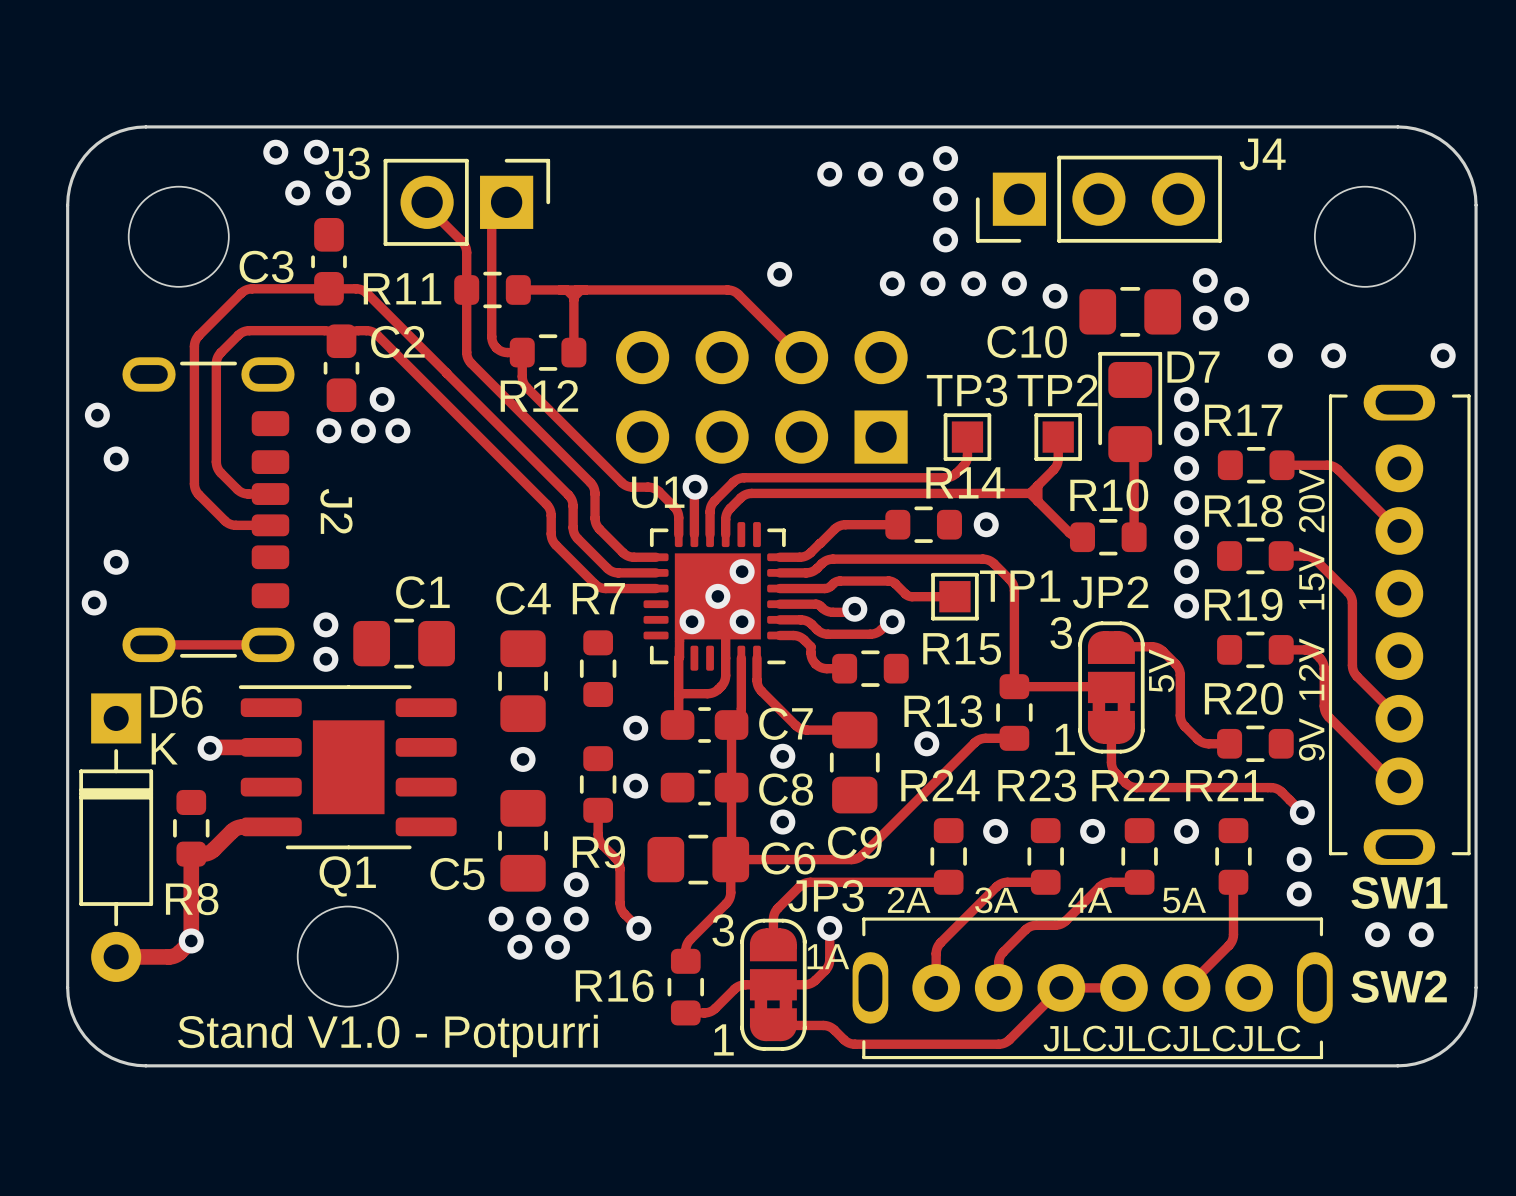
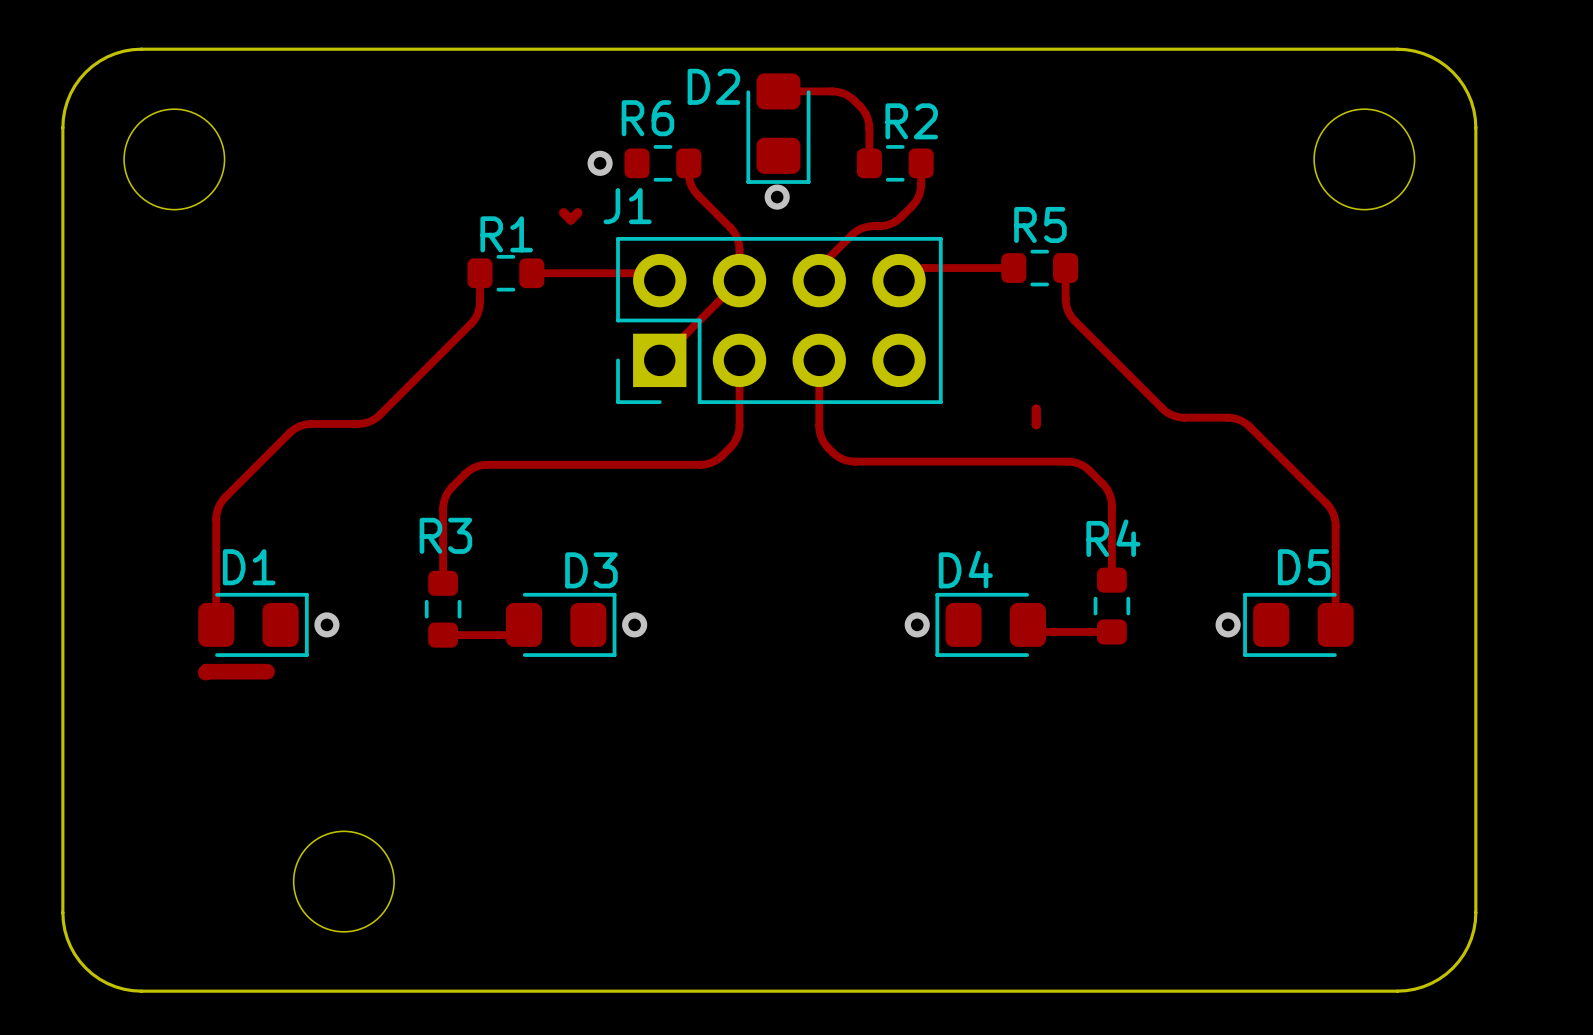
via: (275, 152) -> none
via: (316, 152) -> none
via: (945, 158) -> none
track: none -> (778, 91) (835, 91) (852, 98) (862, 108) (868, 119) (869, 163)
via: (829, 174) -> none
via: (870, 174) -> none
via: (911, 174) -> none
via: (297, 192) -> none
via: (338, 192) -> none
via: (945, 199) -> none
J4: (1098, 199) -> none
track: (427, 202) (427, 206) (462, 241) (466, 248) (466, 352) (469, 361) (591, 484) (594, 491) (595, 520) (599, 529) (626, 555) (656, 557) -> none
J3: (466, 202) -> none
track: (506, 202) (495, 213) (491, 222) (491, 336) (493, 344) (503, 351) (522, 352) (522, 378) (525, 386) (622, 483) (629, 486) (653, 488) (674, 506) (678, 514) (678, 534) -> none
D2: none -> (778, 128)
via: (945, 239) -> none
via: none -> (600, 163)
R6: none -> (662, 163)
track: none -> (688, 163) (689, 179) (694, 190) (730, 227) (737, 237) (739, 246) (739, 280) (659, 360)
R2: none -> (895, 163)
track: none -> (921, 163) (920, 190) (914, 204) (893, 222) (885, 225) (864, 227) (853, 233) (824, 263) (819, 280)
C3: (328, 261) -> none
via: (1205, 280) -> none
via: (892, 283) -> none
via: (933, 283) -> none
via: (973, 283) -> none
via: (1014, 283) -> none
R11: (492, 289) -> none
track: (518, 289) (730, 290) (738, 294) (801, 357) -> none
track: (576, 289) (573, 292) (573, 352) -> none
via: (1055, 296) -> none
via: (1236, 299) -> none
C10: (1130, 311) -> none
via: (1205, 318) -> none
track: none -> (1013, 268) (921, 268) (909, 271) (899, 280)
R5: none -> (1039, 268)
track: none -> (1065, 268) (1065, 301) (1070, 316) (1164, 410) (1181, 417) (1230, 417) (1242, 421) (1328, 505) (1335, 522) (1335, 624)
track: none -> (480, 273) (479, 304) (474, 319) (377, 416) (360, 423) (308, 424) (296, 427) (223, 499) (216, 516) (216, 624)
R1: none -> (505, 273)
track: none -> (531, 273) (652, 273) (659, 280)
R12: (548, 352) -> none
via: (1280, 355) -> none
via: (1333, 355) -> none
via: (1443, 355) -> none
C2: (341, 368) -> none
J1 side: bottom (761, 397) -> top (779, 320)
via: (382, 399) -> none
via: (1186, 399) -> none
D7: (1130, 407) -> none
via: (97, 415) -> none
via: (328, 430) -> none
via: (363, 430) -> none
via: (397, 430) -> none
via: (1186, 433) -> none
track: none -> (739, 360) (738, 434) (730, 447) (712, 462) (700, 464) (487, 464) (478, 466) (467, 471) (450, 489) (443, 503) (443, 583)
track: none -> (819, 360) (819, 432) (826, 445) (842, 459) (854, 461) (1067, 461) (1076, 462) (1087, 468) (1104, 486) (1111, 499) (1111, 580)
track: (967, 437) (966, 461) (955, 474) (948, 477) (738, 478) (711, 504) (710, 534) -> none
TP3: (967, 437) -> none
track: (1058, 437) (1058, 460) (1056, 466) (1030, 493) -> none
TP2: (1058, 437) -> none
track: (1130, 444) (1134, 448) (1134, 537) -> none
via: (116, 458) -> none
R17: (1256, 465) -> none
track: (1282, 465) (1327, 465) (1334, 467) (1399, 530) -> none
via: (1186, 468) -> none
track: (695, 487) (694, 534) -> none
via: (695, 487) -> none
track: (1030, 493) (749, 493) (742, 496) (727, 512) (725, 534) -> none
track: (1030, 493) (1070, 533) (1082, 537) -> none
track: (270, 494) (241, 492) (217, 467) (216, 363) (218, 355) (239, 333) (247, 330) (326, 330) (333, 333) (341, 341) (354, 331) (370, 331) (377, 335) (547, 505) (550, 512) (553, 541) (595, 585) (604, 588) (656, 588) -> none
text: 20V (1311, 500) -> none
via: (1186, 502) -> none
J2: (208, 509) -> none
track: (897, 524) (842, 525) (835, 528) (820, 543) -> none
R14: (923, 524) -> none
via: (986, 524) -> none
track: (270, 525) (229, 524) (195, 489) (195, 340) (241, 293) (247, 289) (358, 288) (367, 293) (569, 496) (573, 504) (573, 529) (575, 535) (607, 568) (616, 572) (656, 572) -> none
R10: (1108, 537) -> none
via: (1186, 537) -> none
track: (819, 543) (804, 556) (779, 557) -> none
R18: (1255, 556) -> none
track: (1281, 556) (1307, 556) (1313, 558) (1349, 594) (1352, 601) (1353, 671) (1399, 718) -> none
via: (116, 562) -> none
via: (742, 571) -> none
via: (1186, 571) -> none
track: (779, 572) (810, 572) (825, 561) (832, 559) (988, 560) (1009, 579) (1014, 587) (1014, 686) (1111, 687) -> none
text: 15V (1311, 578) -> none
track: (779, 588) (825, 588) (838, 581) (888, 581) (893, 582) (910, 596) (954, 596) -> none
U1: (717, 596) -> none
via: (717, 596) -> none
TP1: (954, 596) -> none
via: (94, 602) -> none
track: (779, 604) (816, 604) (829, 611) (850, 612) -> none
via: (1186, 606) -> none
via: (854, 609) -> none
track: (779, 619) (805, 620) (820, 632) (828, 634) (873, 633) (880, 630) (889, 621) (892, 621) -> none
via: (692, 621) -> none
via: (742, 621) -> none
via: (892, 621) -> none
via: (325, 624) -> none
SW1: (1399, 624) -> none
track: (779, 635) (796, 635) (803, 639) (810, 646) (812, 658) (819, 666) (844, 668) -> none
C1: (404, 643) -> none
track: (149, 644) (267, 644) -> none
track: (1111, 646) (1153, 646) (1161, 650) (1177, 665) (1179, 671) (1180, 716) (1182, 724) (1202, 742) (1229, 743) -> none
R19: (1255, 649) -> none
track: (1281, 649) (1308, 650) (1319, 657) (1324, 666) (1324, 707) (1326, 714) (1393, 781) (1399, 781) -> none
track: (741, 658) (741, 710) (738, 717) (731, 725) (730, 859) -> none
track: (756, 658) (758, 687) (797, 726) (806, 730) (854, 730) -> none
via: (325, 659) -> none
R7: (598, 668) -> none
R15: (870, 668) -> none
text: 12V (1311, 669) -> none
text: 5V (1161, 670) -> none
C4: (523, 681) -> none
R4: none -> (1111, 606)
R3: none -> (443, 609)
JP2: (1111, 687) -> none
track: (678, 693) (707, 693) (711, 693) (718, 689) (724, 681) (725, 609) (723, 601) (717, 596) (684, 630) (680, 636) (677, 725) -> none
D1: none -> (253, 624)
via: none -> (326, 624)
track: none -> (523, 624) (513, 635) (443, 635)
D3: none -> (561, 624)
via: none -> (917, 624)
D4: none -> (990, 624)
track: none -> (1027, 624) (1034, 631) (1111, 631)
via: none -> (1228, 624)
D5: none -> (1298, 624)
R13: (1014, 712) -> none
C7: (704, 725) -> none
via position: (635, 728) -> (634, 624)
track: (1111, 728) (1112, 766) (1116, 773) (1130, 786) (1273, 787) (1280, 791) (1302, 812) -> none
track: (1014, 738) (984, 738) (975, 741) (857, 858) (730, 859) -> none
text: 9V (1311, 739) -> none
via: (926, 743) -> none
R20: (1255, 743) -> none
via: (210, 748) -> none
via: (782, 756) -> none
via: (523, 759) -> none
C9: (854, 762) -> none
Q1: (347, 767) -> none
R9: (598, 784) -> none
via: (635, 786) -> none
C8: (704, 787) -> none
track: (598, 810) (599, 840) (616, 859) (619, 866) (621, 909) (638, 928) -> none
via: (1302, 812) -> none
via: (782, 822) -> none
track: (271, 826) (237, 828) (210, 852) (191, 854) (191, 940) (178, 953) (168, 956) (116, 956) -> none
R8: (191, 828) -> none
via: (995, 831) -> none
via: (1092, 831) -> none
via: (1186, 831) -> none
D6: (116, 837) -> none
C5: (523, 840) -> none
R24: (948, 856) -> none
R23: (1045, 856) -> none
R22: (1139, 856) -> none
R21: (1233, 856) -> none
C6: (698, 859) -> none
track: (730, 859) (729, 898) (689, 941) (685, 948) (685, 961) -> none
via: (1299, 859) -> none
track: (948, 882) (804, 883) (775, 911) (773, 944) -> none
track: (1045, 882) (1006, 882) (996, 886) (938, 945) (936, 953) (936, 987) -> none
track: (1139, 882) (1104, 883) (1062, 923) (1033, 925) (1026, 928) (999, 957) (998, 987) -> none
track: (1233, 882) (1232, 940) (1186, 987) -> none
via: (576, 884) -> none
via: (1299, 894) -> none
text: 2A (909, 900) -> none
text: 3A (996, 900) -> none
text: 4A (1090, 900) -> none
text: 5A (1184, 900) -> none
via: (501, 919) -> none
via: (538, 919) -> none
via: (576, 919) -> none
via: (638, 928) -> none
track: (829, 928) (829, 964) (812, 982) (804, 984) (742, 985) (735, 988) (710, 1011) (685, 1012) -> none
via: (829, 928) -> none
via: (1377, 934) -> none
via: (1421, 934) -> none
via: (191, 940) -> none
via: (519, 947) -> none
via: (557, 947) -> none
text: 1A (828, 956) -> none
JP3: (773, 984) -> none
R16: (685, 987) -> none
track: (1123, 987) (1061, 987) (1009, 1039) (1000, 1044) (852, 1044) (845, 1041) (833, 1029) (826, 1025) (773, 1025) -> none
SW2: (1092, 988) -> none
text: Stand V1.0 - Potpurri (387, 1036) -> none
text: JLCJLCJLCJLC (1172, 1038) -> none

